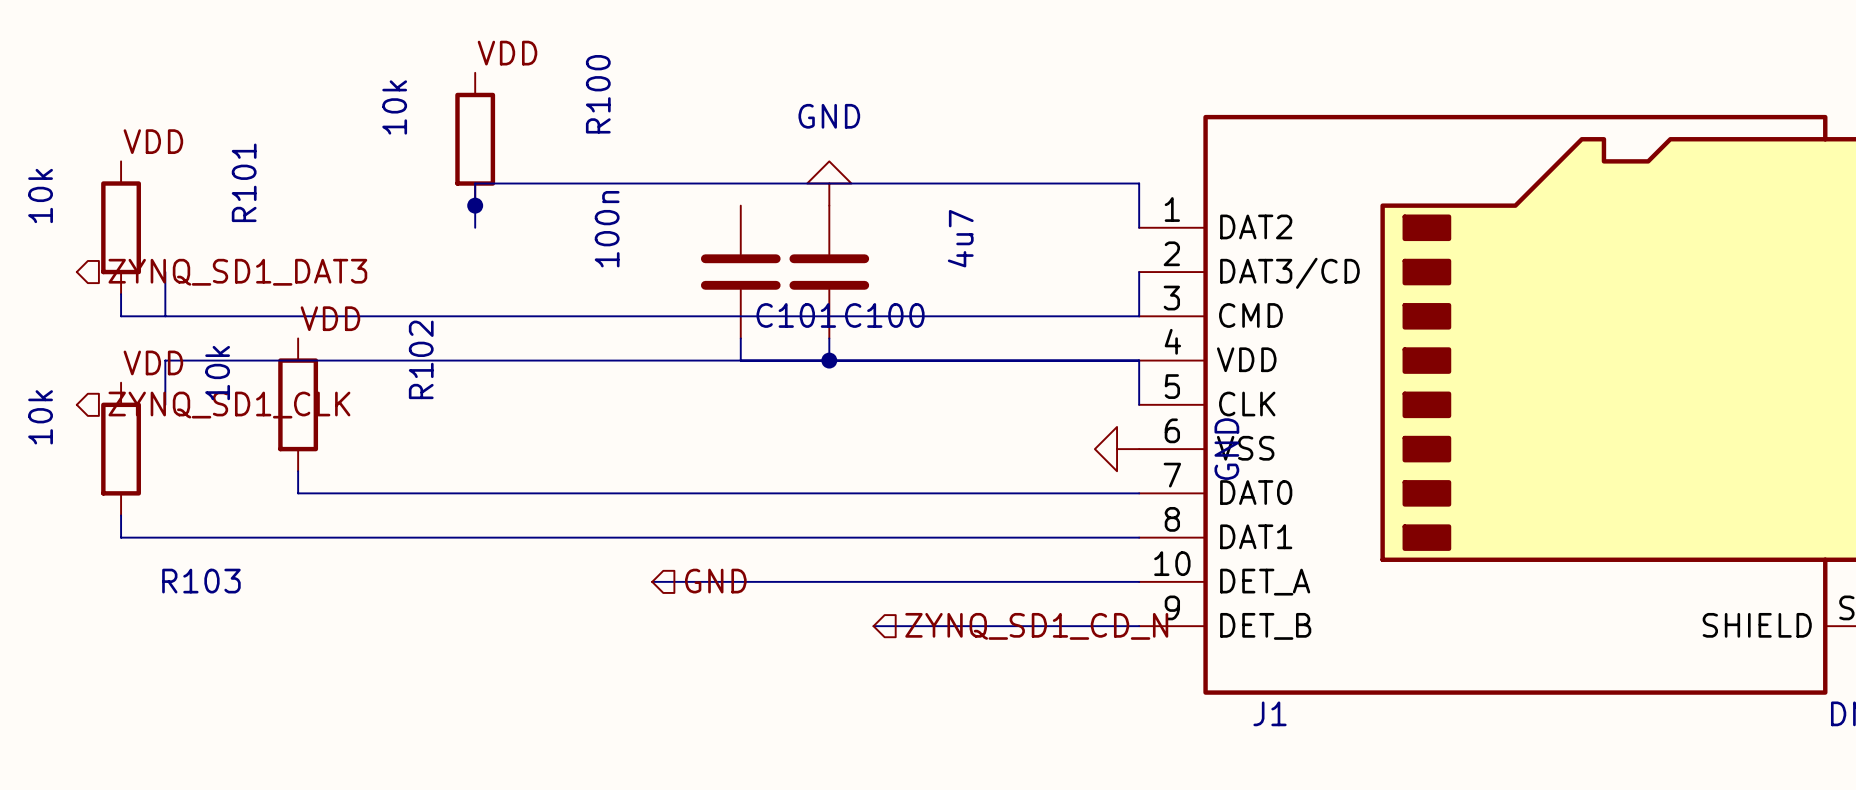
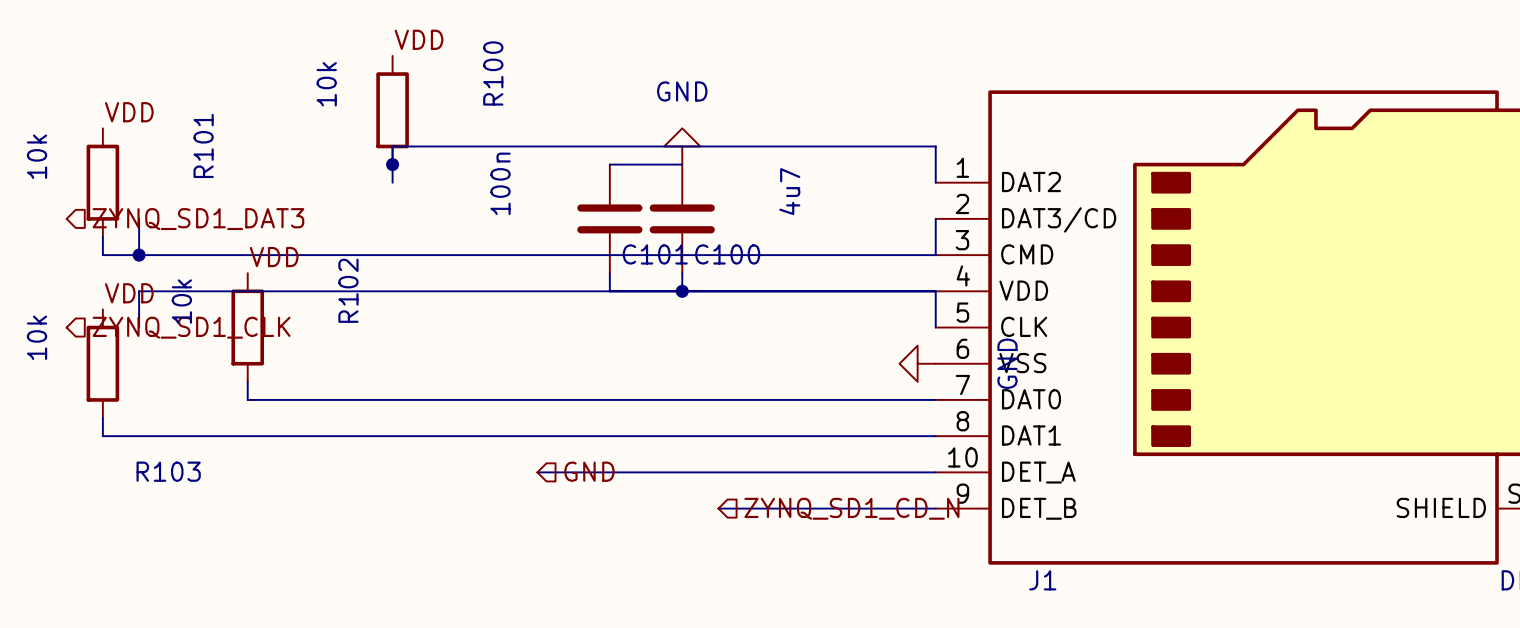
wire: none -> (609, 164) (682, 164)
junction: none -> (139, 255)

